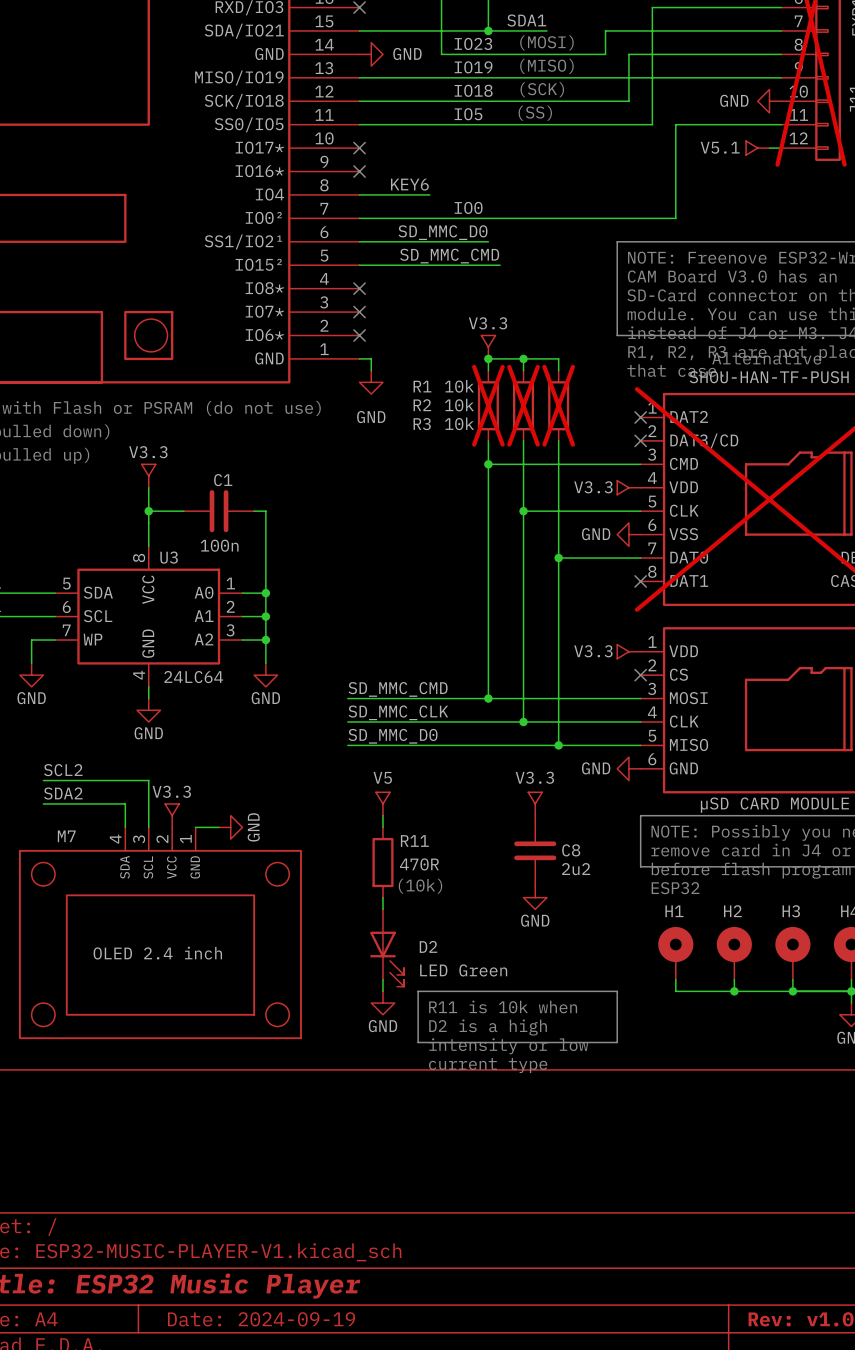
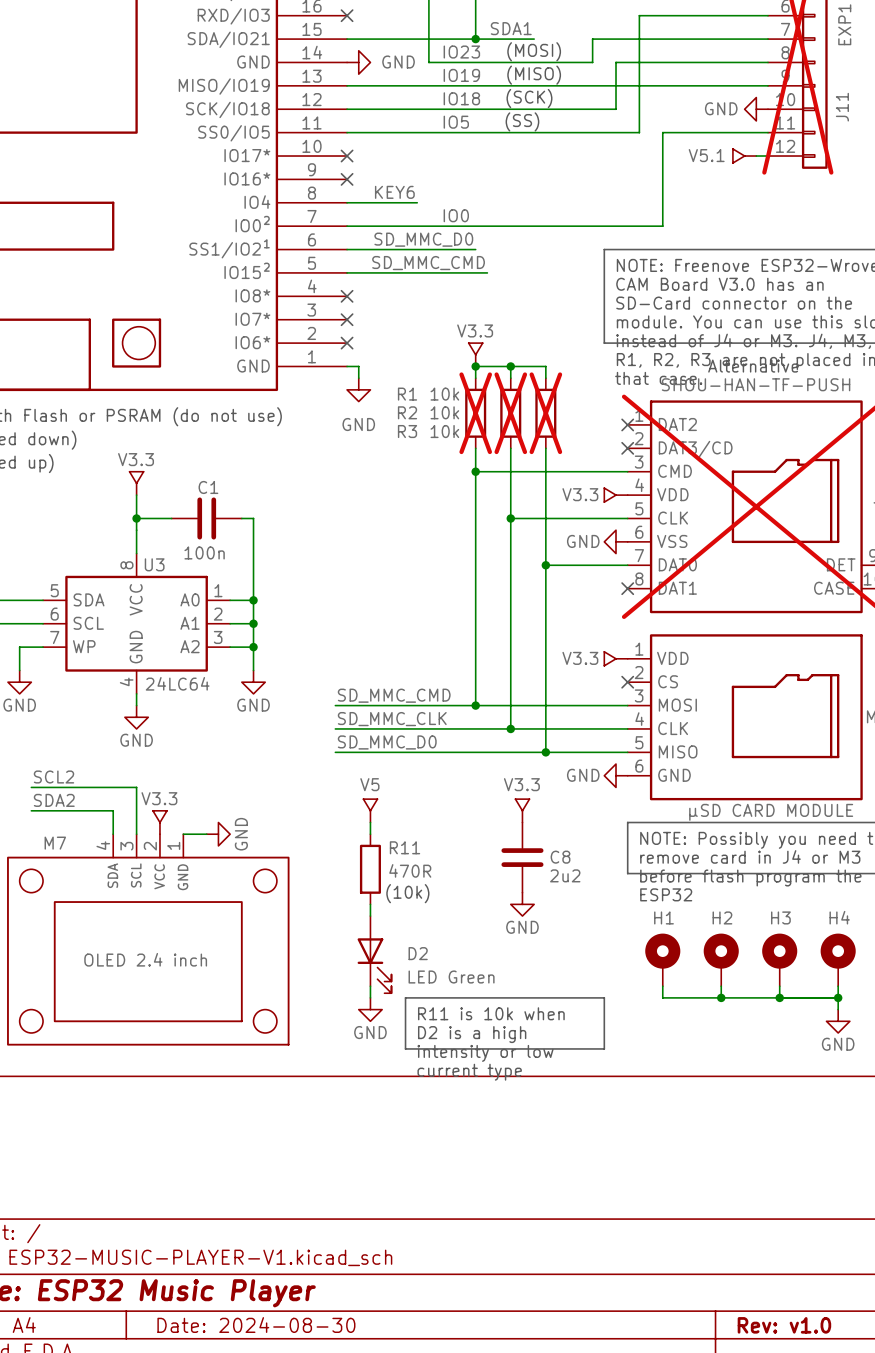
title block: Date: 2024-09-19 (261, 1319) -> Date: 2024-08-30 (256, 1325)

